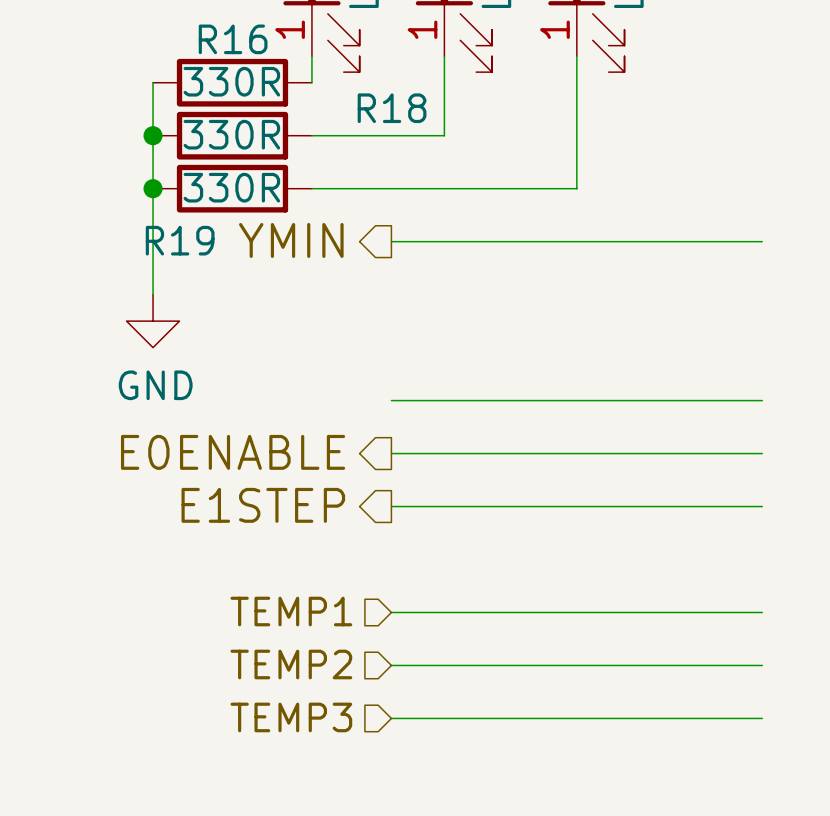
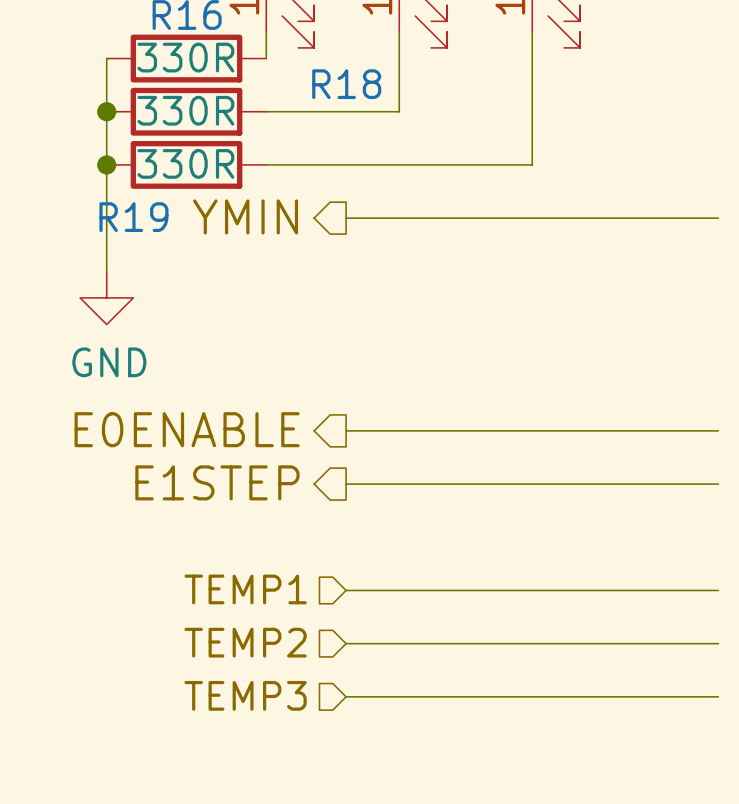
wire: (391, 400) (762, 400) -> none

